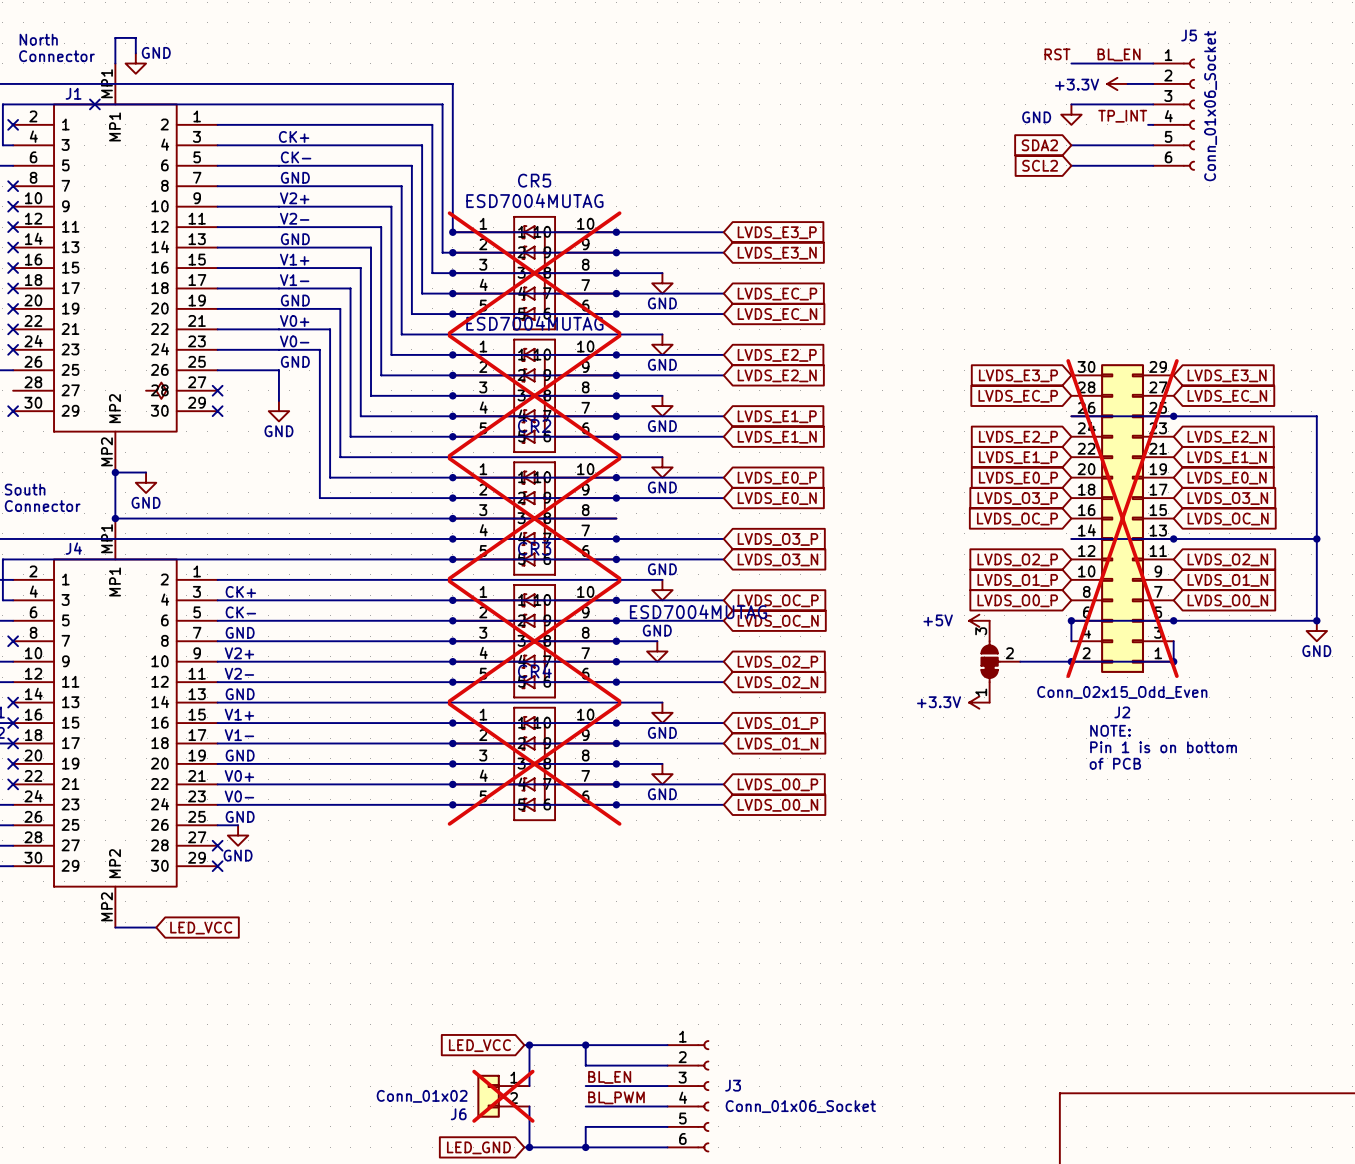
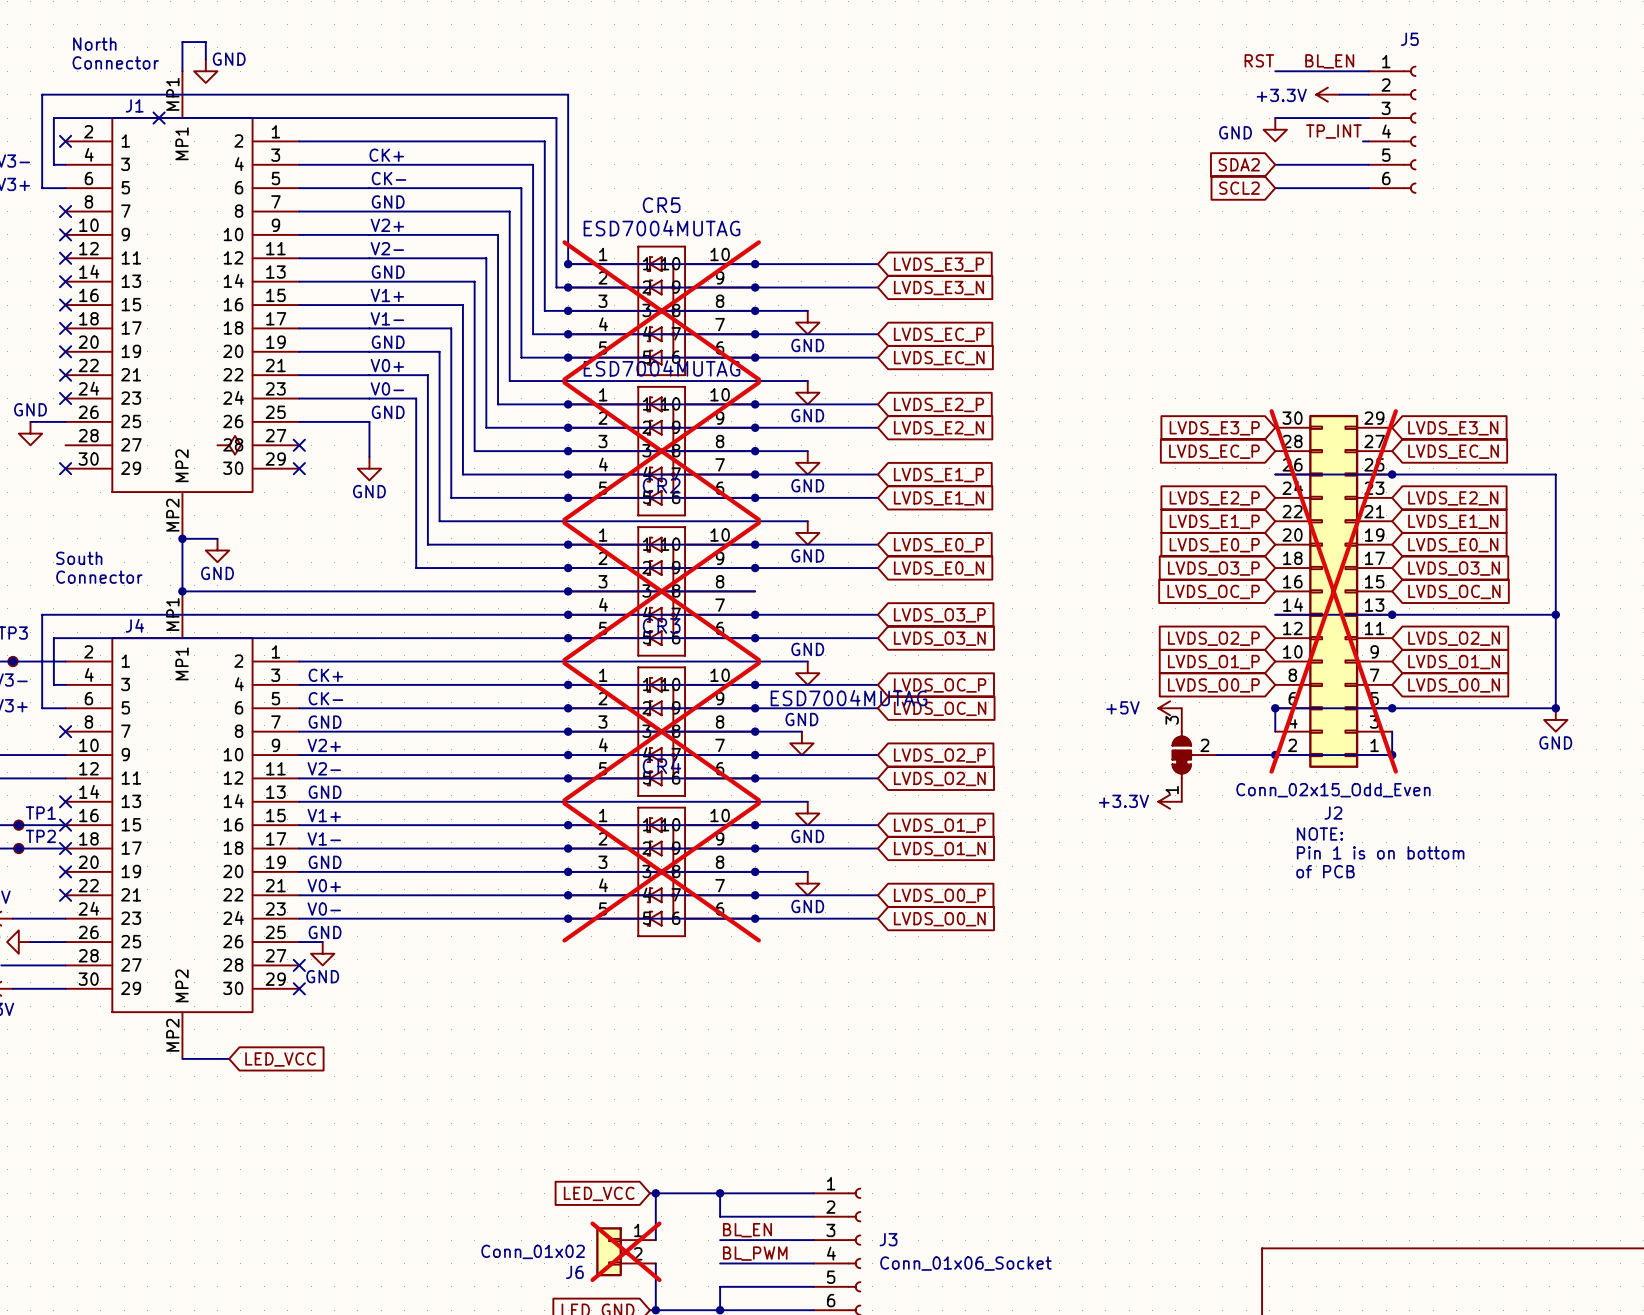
J5 value: Conn_01x06_Socket (1210, 106) -> none

